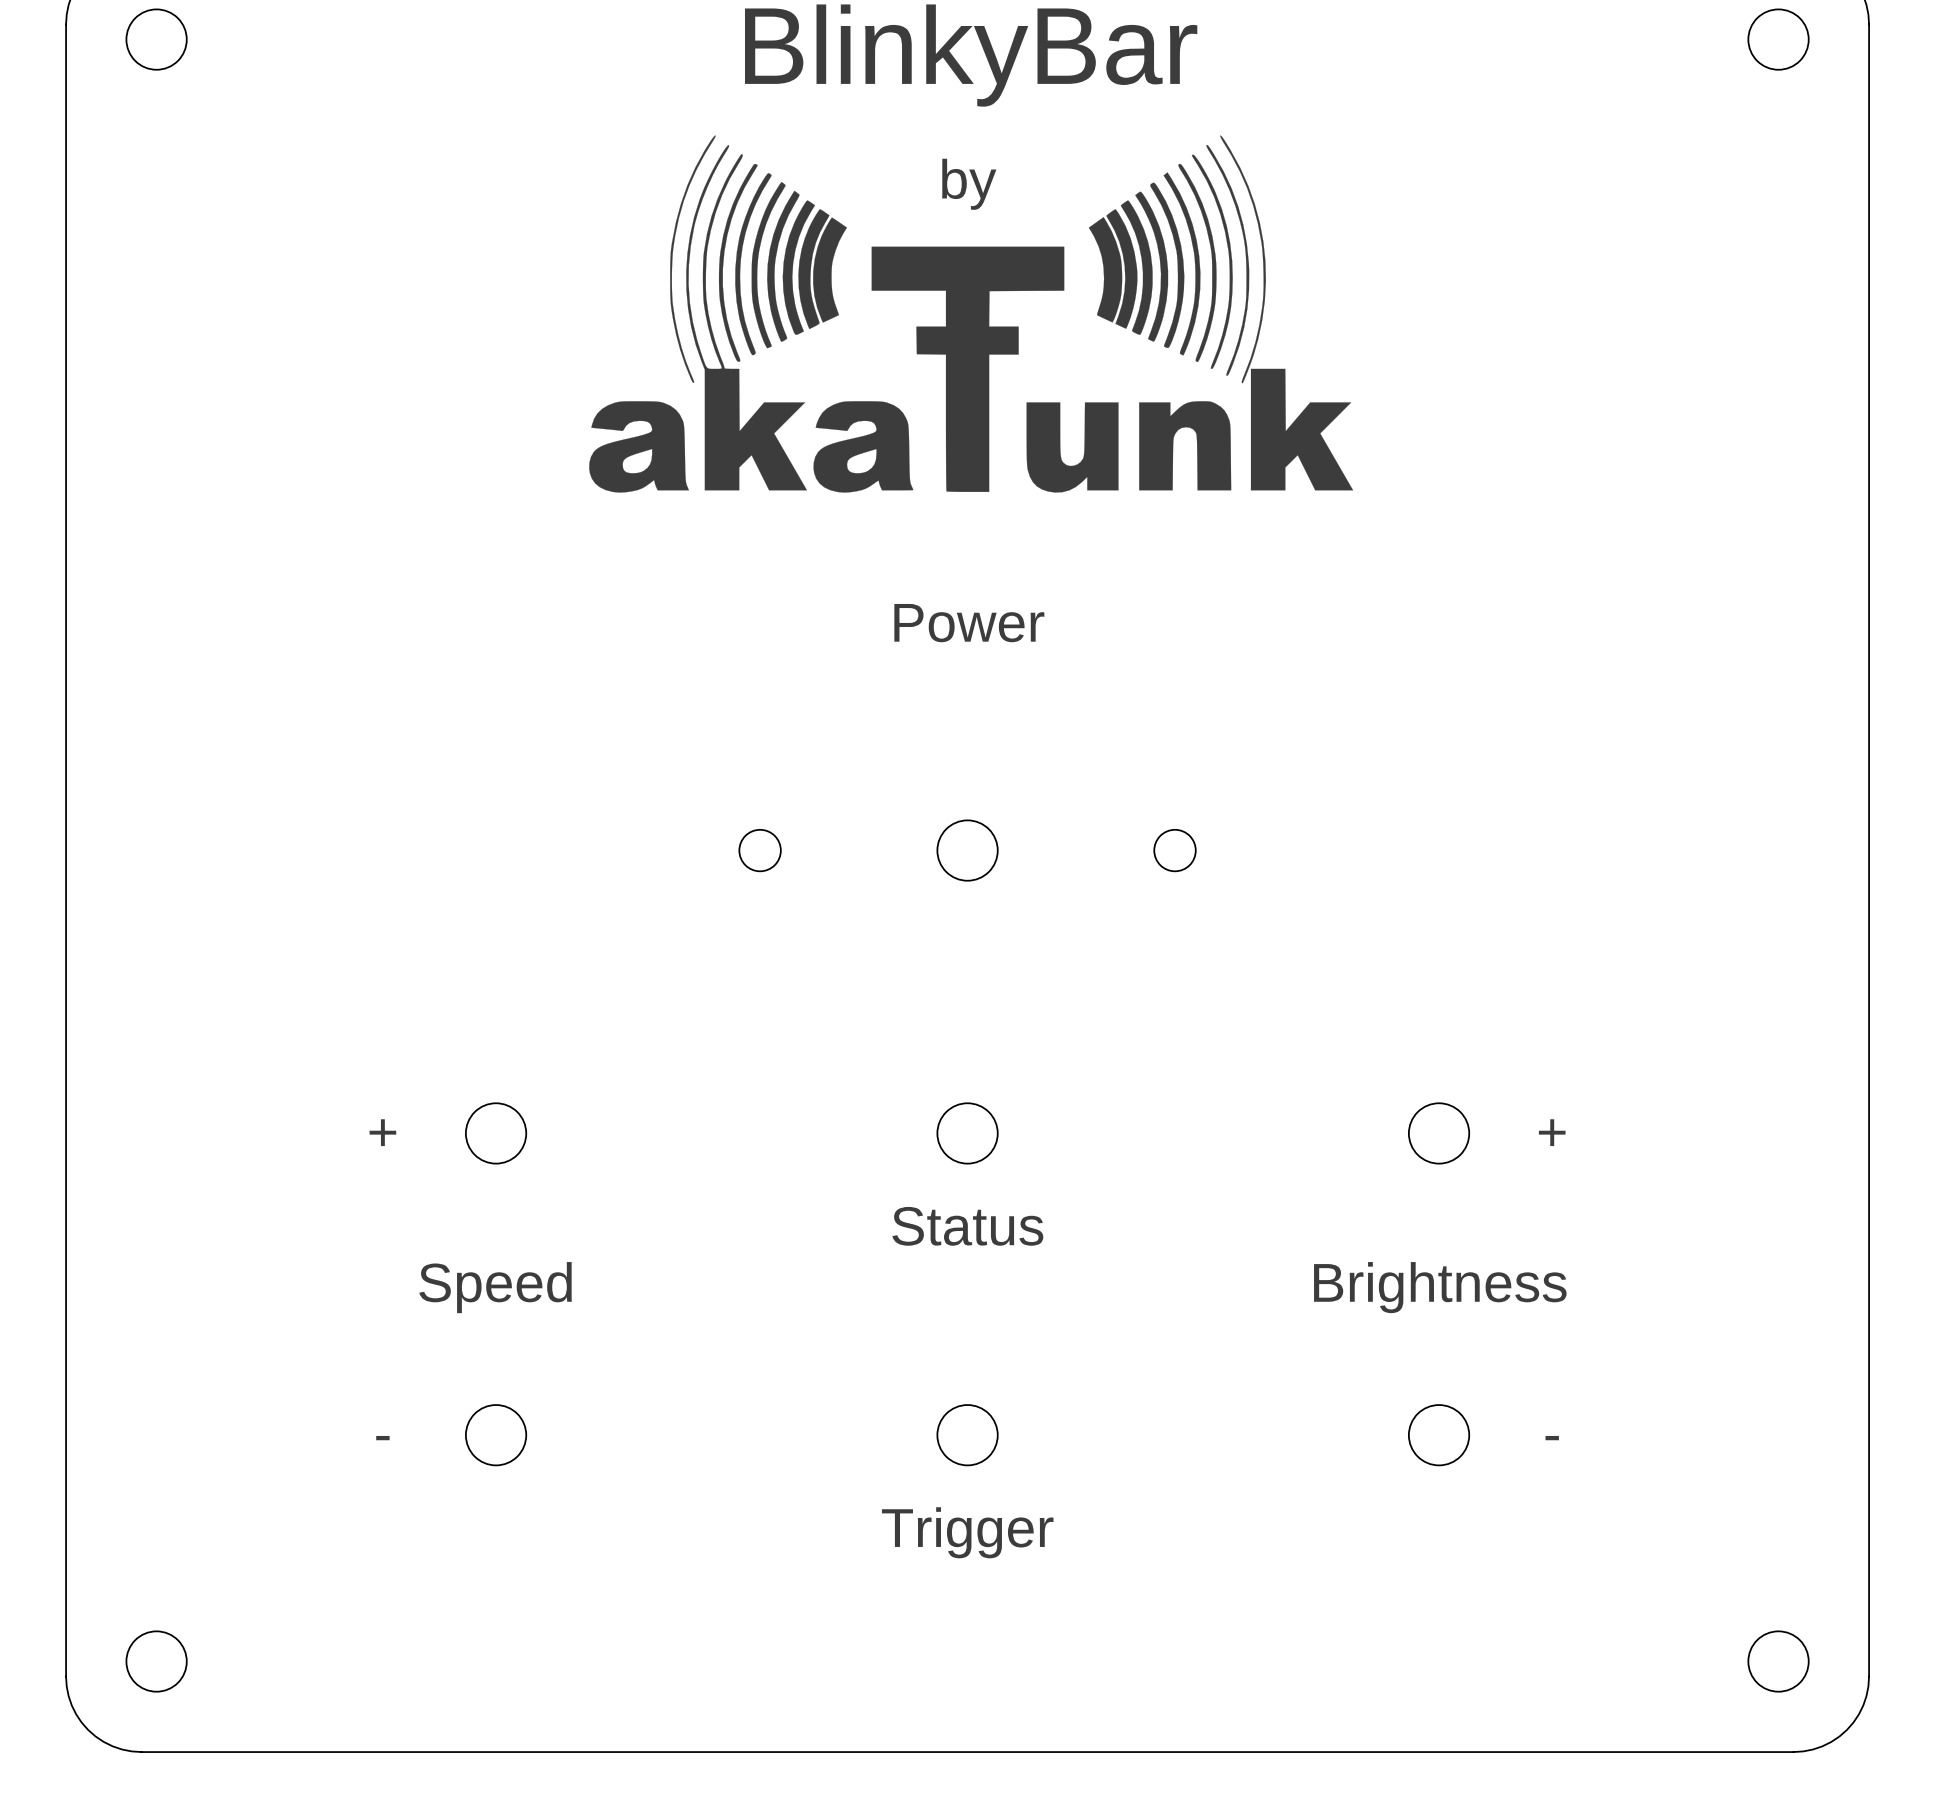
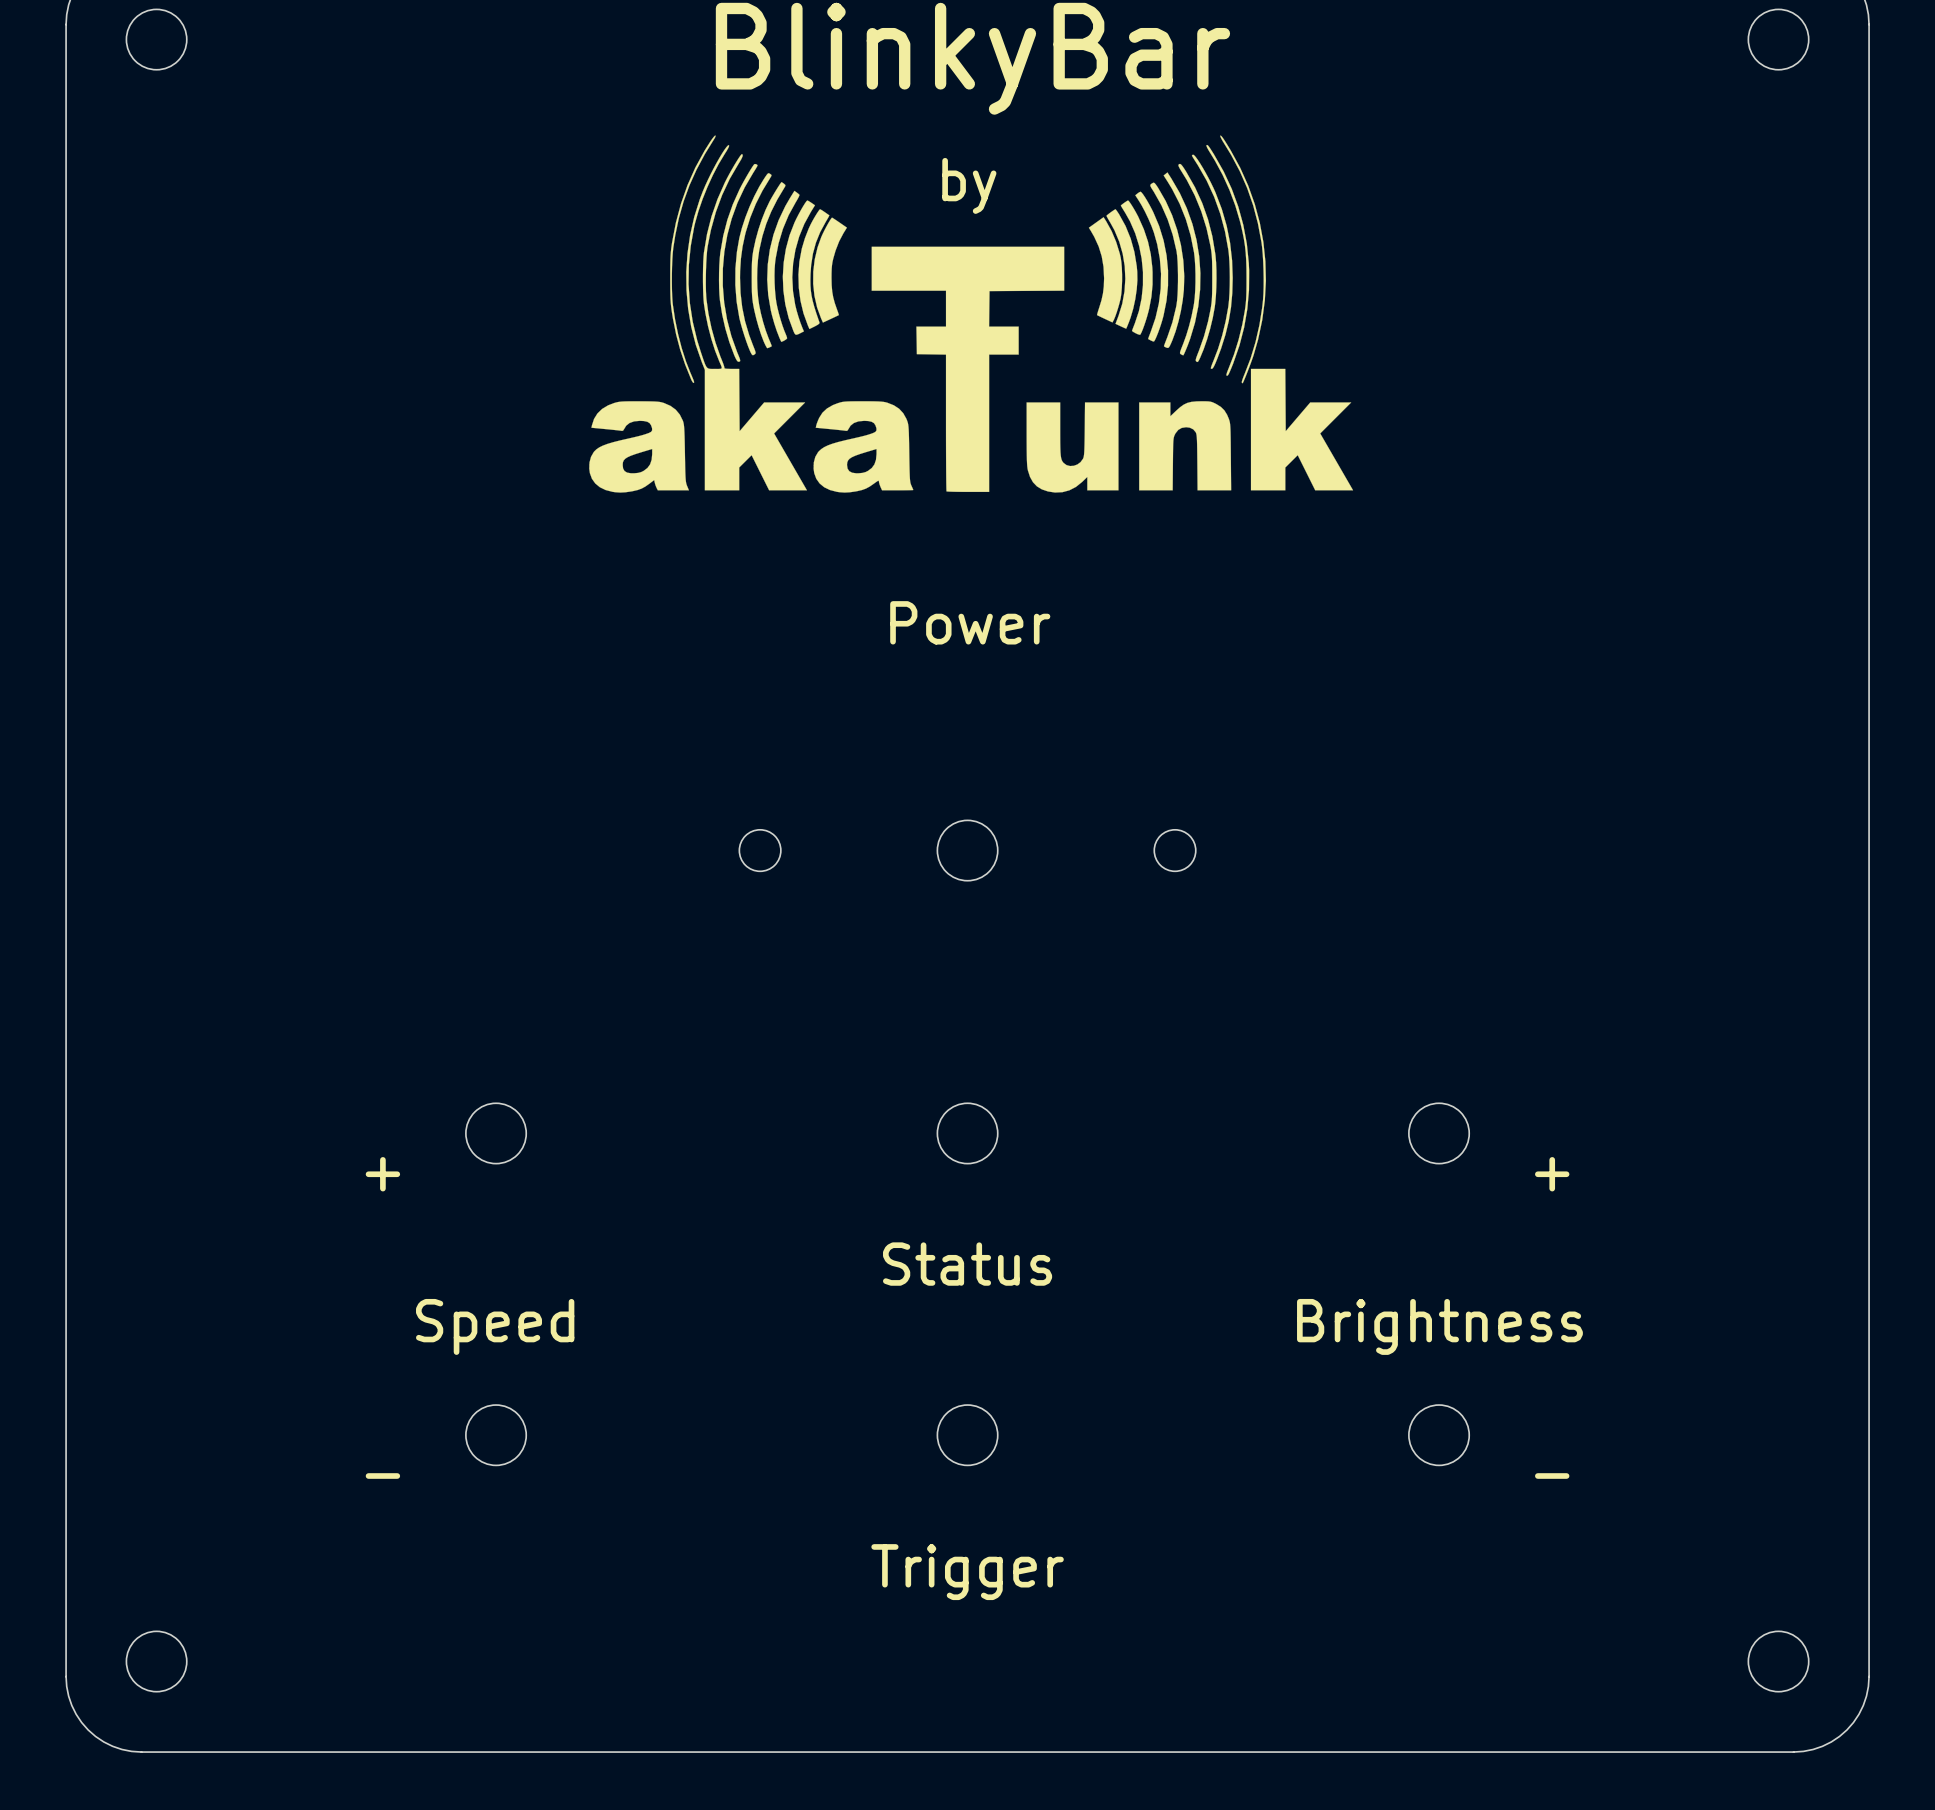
text position: + (382, 1132) -> + (382, 1174)
text position: + (1552, 1132) -> + (1552, 1174)
text position: Status (967, 1226) -> Status (967, 1264)
text position: Speed (495, 1287) -> Speed (495, 1326)
text position: Brightness (1440, 1287) -> Brightness (1439, 1326)
text position: - (382, 1438) -> - (382, 1476)
text position: - (1552, 1438) -> - (1552, 1476)
text position: Trigger (967, 1532) -> Trigger (967, 1572)

